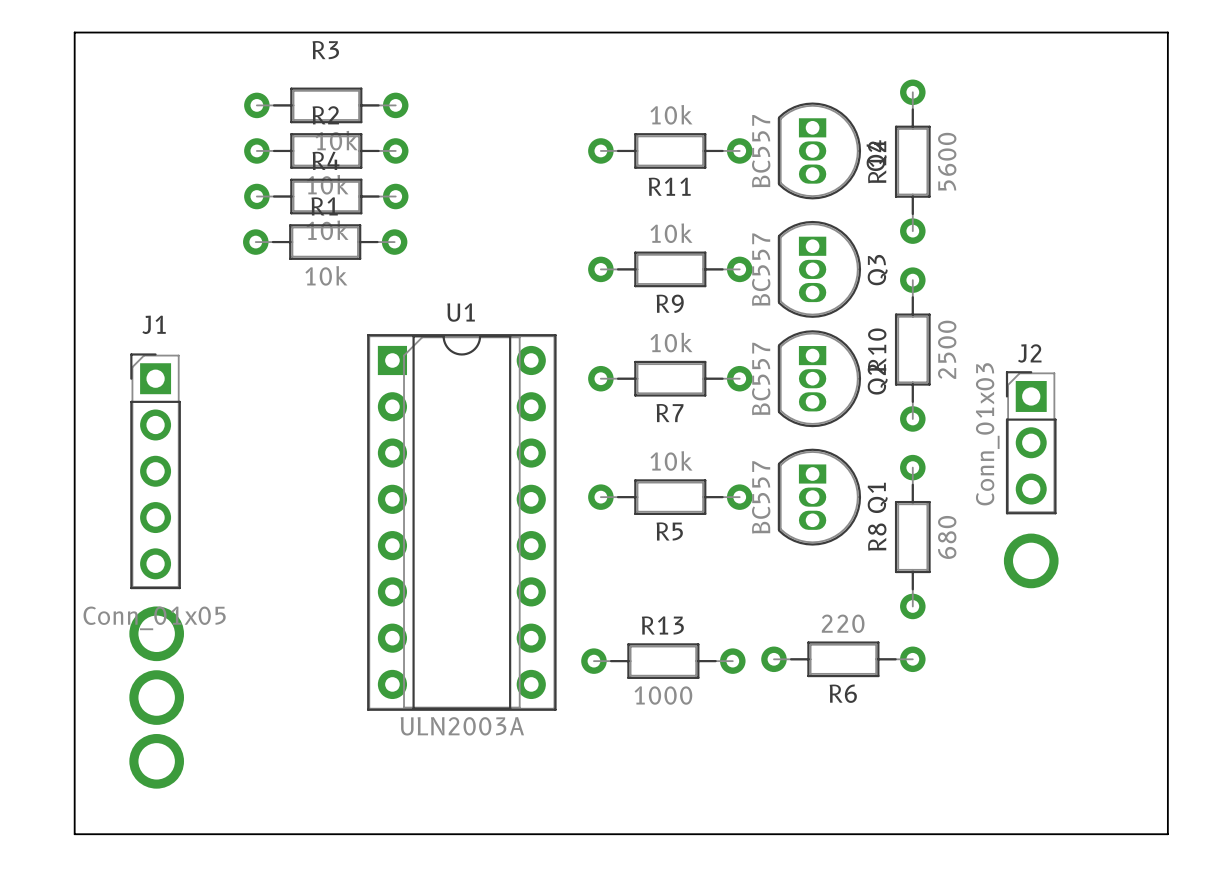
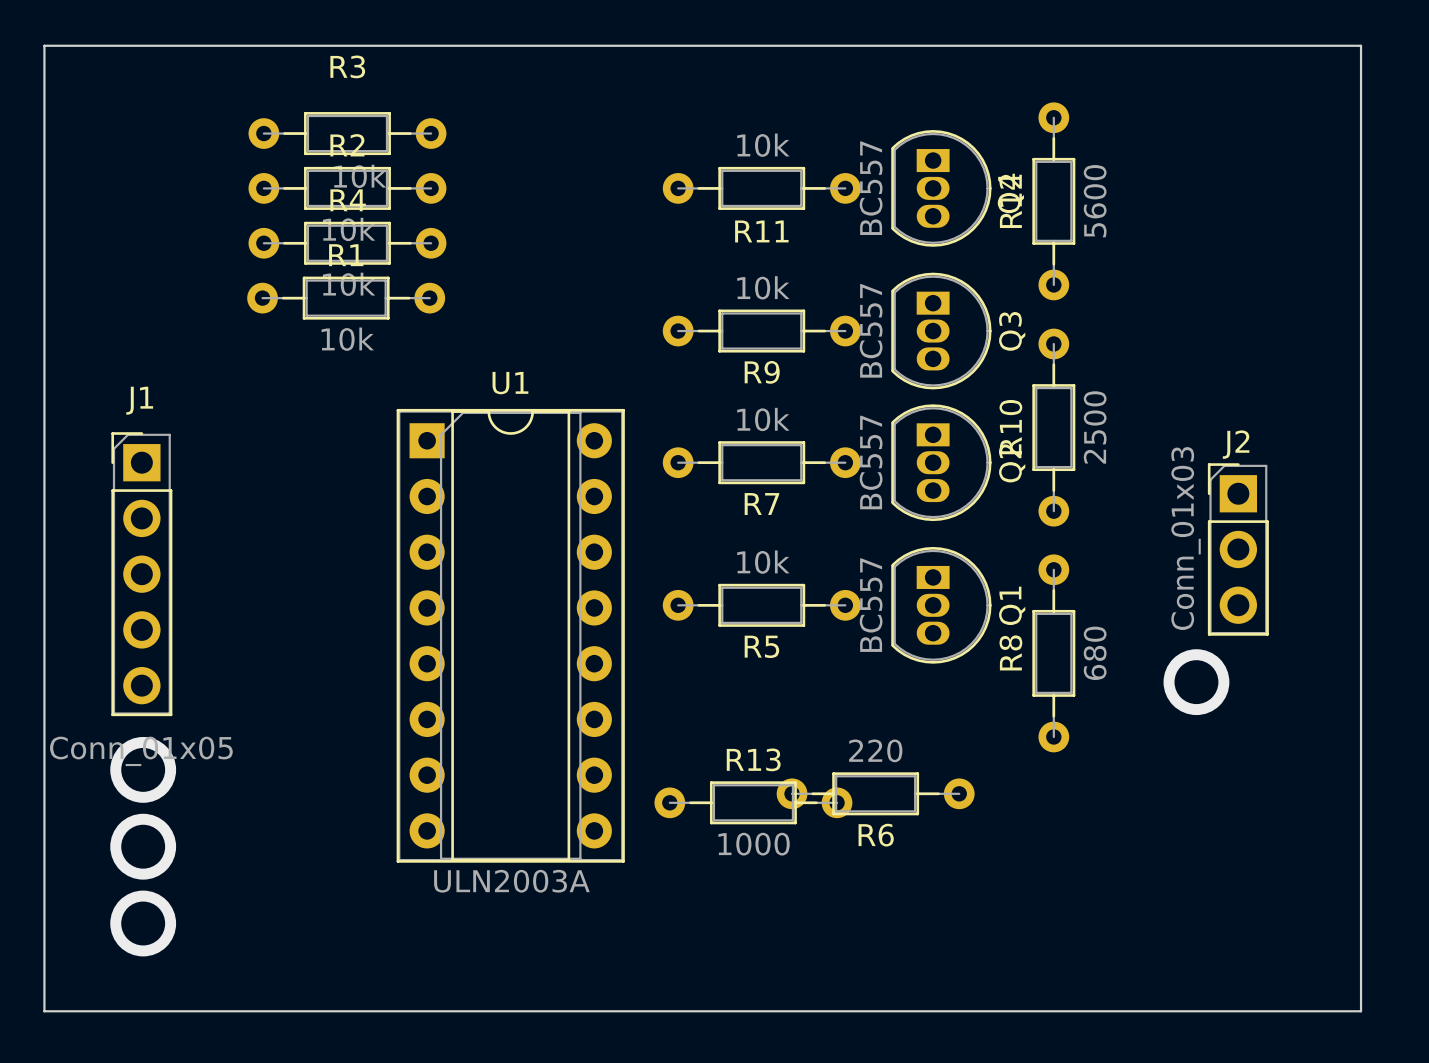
J2 position: (1031, 442) -> (1238, 549)
R6 position: (843, 659) -> (875, 793)

